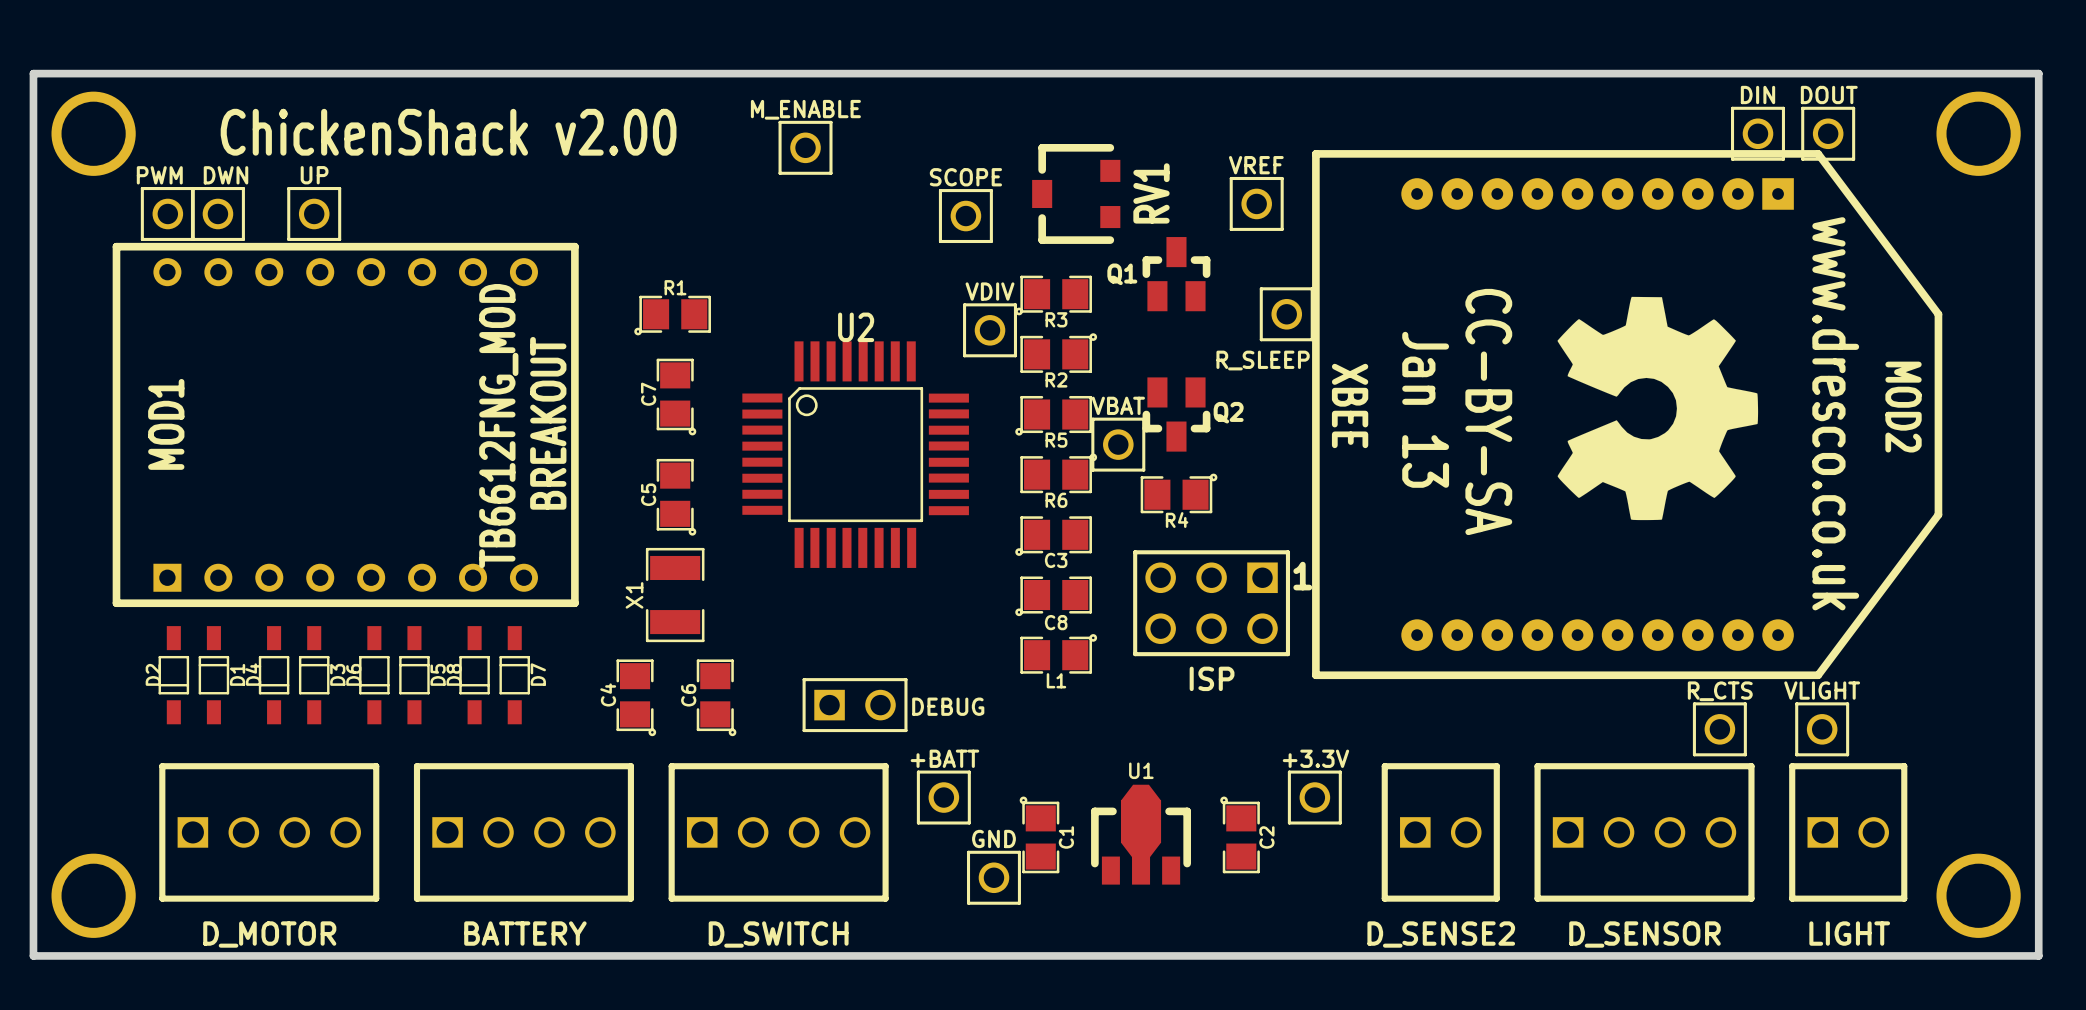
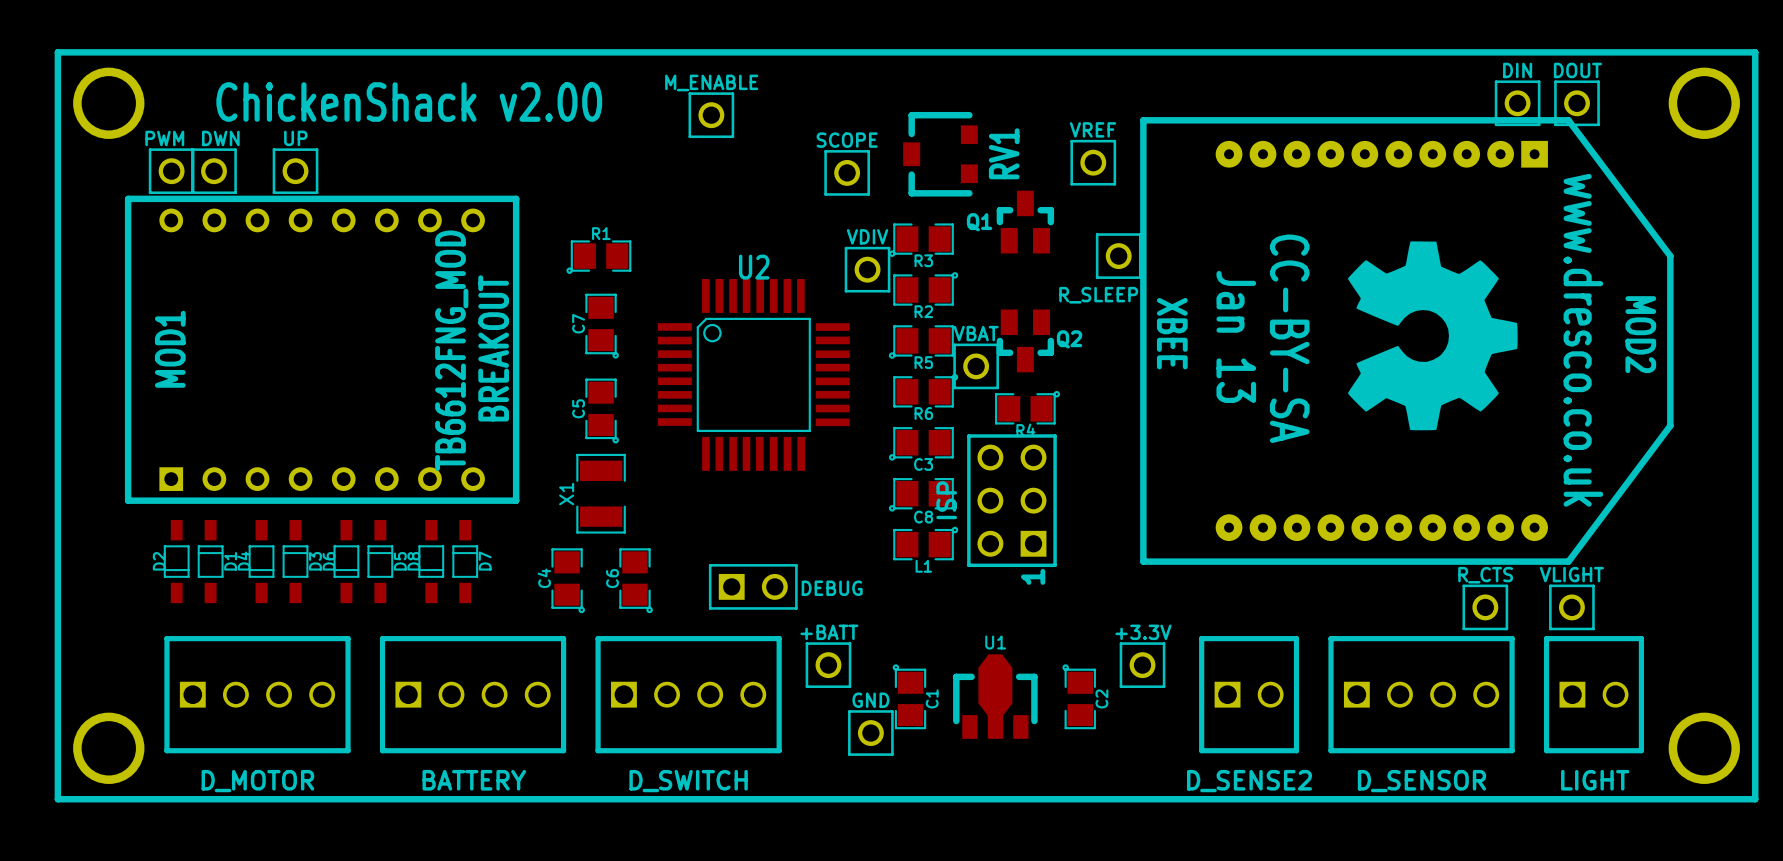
board edge: (33, 73) (2038, 73) (2038, 955) (33, 955) (33, 73) -> none
line: none -> (57, 52) (1755, 52) (1755, 799) (57, 799) (57, 52)
text rotation: 0° (1302, 576) -> 90° counterclockwise (1033, 576)
text position: 1 (1302, 576) -> 1 (1033, 576)
ISP rotation: 0° (1211, 603) -> 90° clockwise (1011, 500)

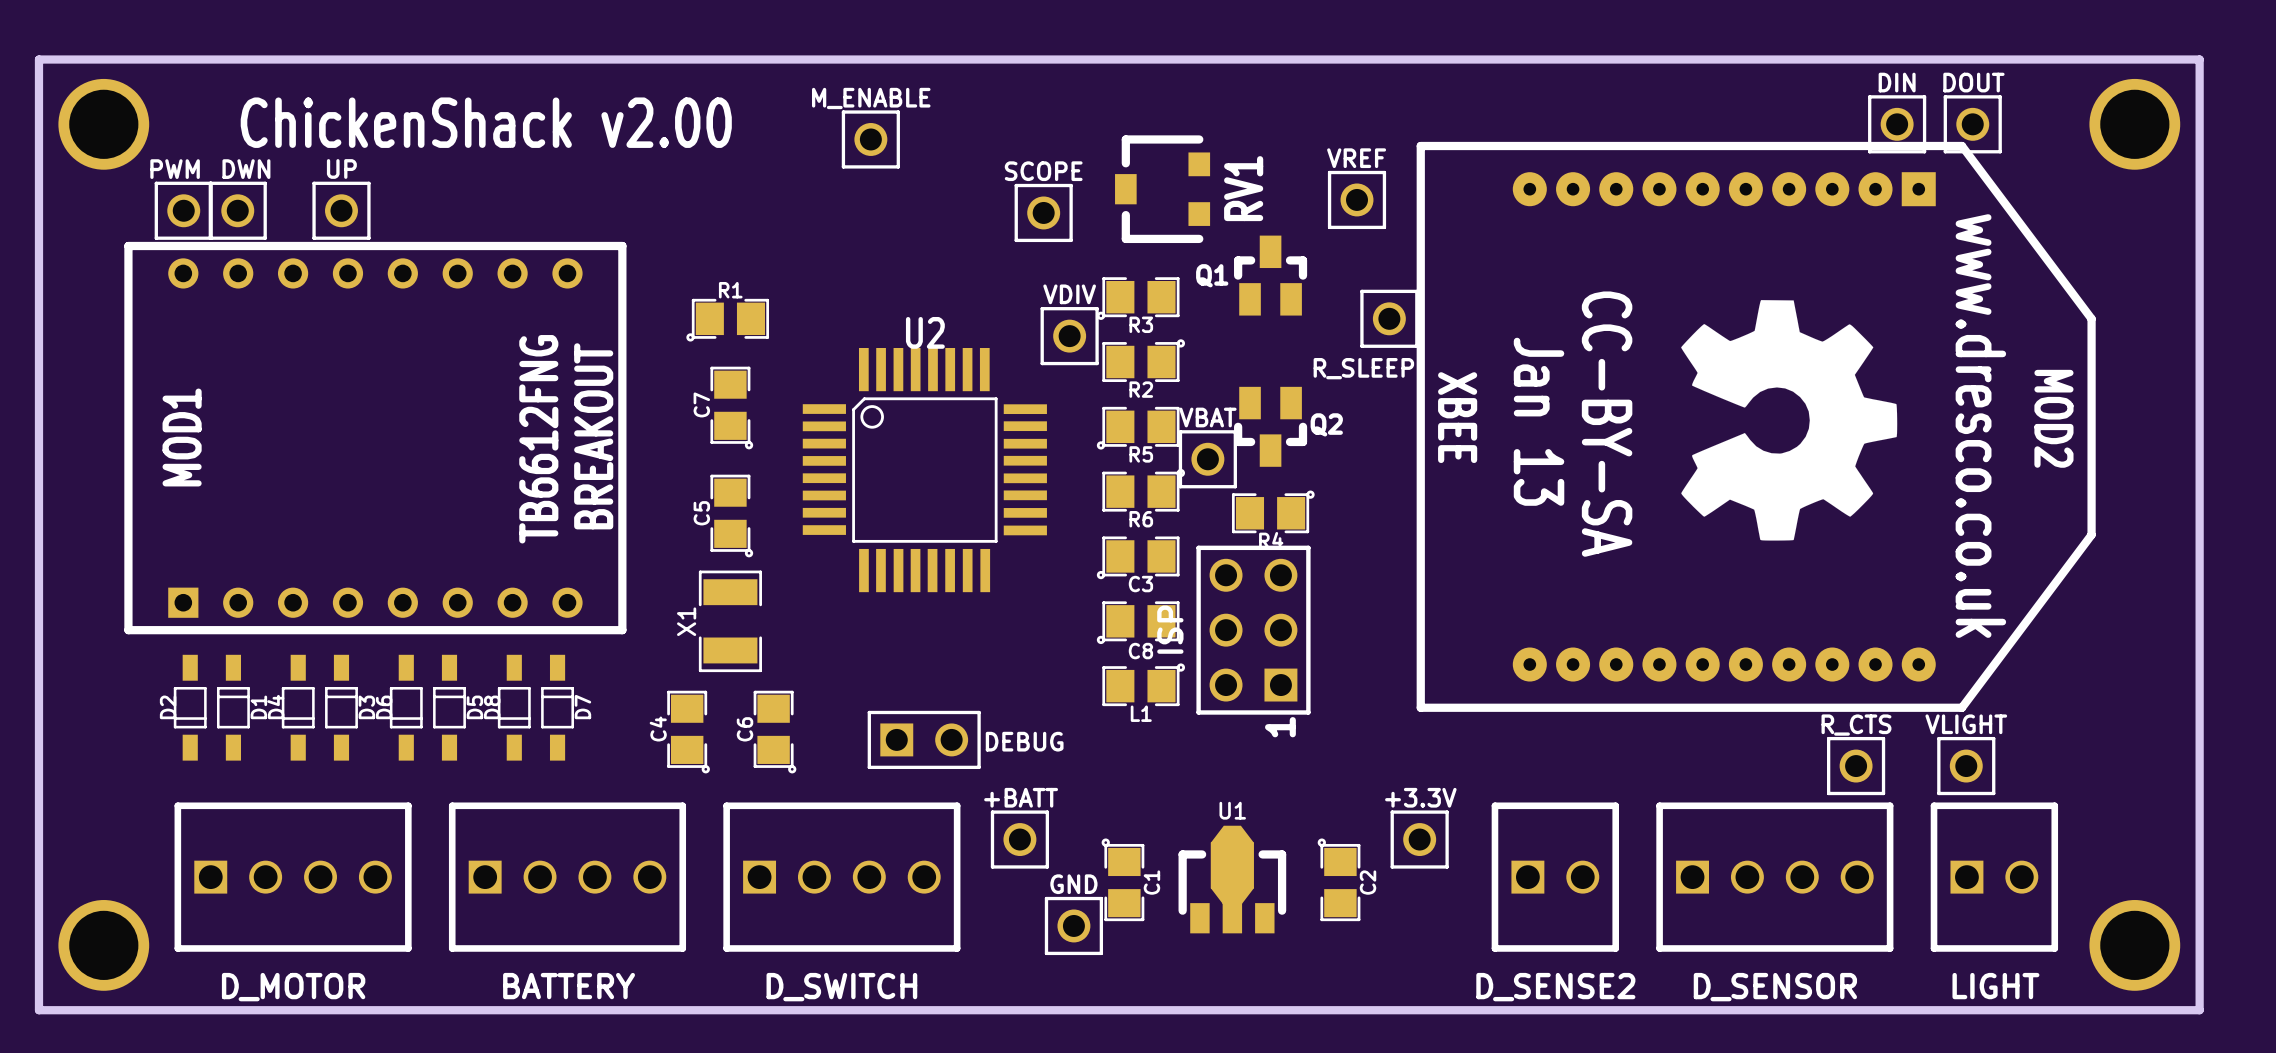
line: (57, 52) (1755, 52) (1755, 799) (57, 799) (57, 52) -> none
board edge: none -> (38, 59) (2199, 59) (2199, 1010) (38, 1010) (38, 59)
MOD1 value: TB6612FNG_MOD (451, 350) -> TB6612FNG (538, 439)

